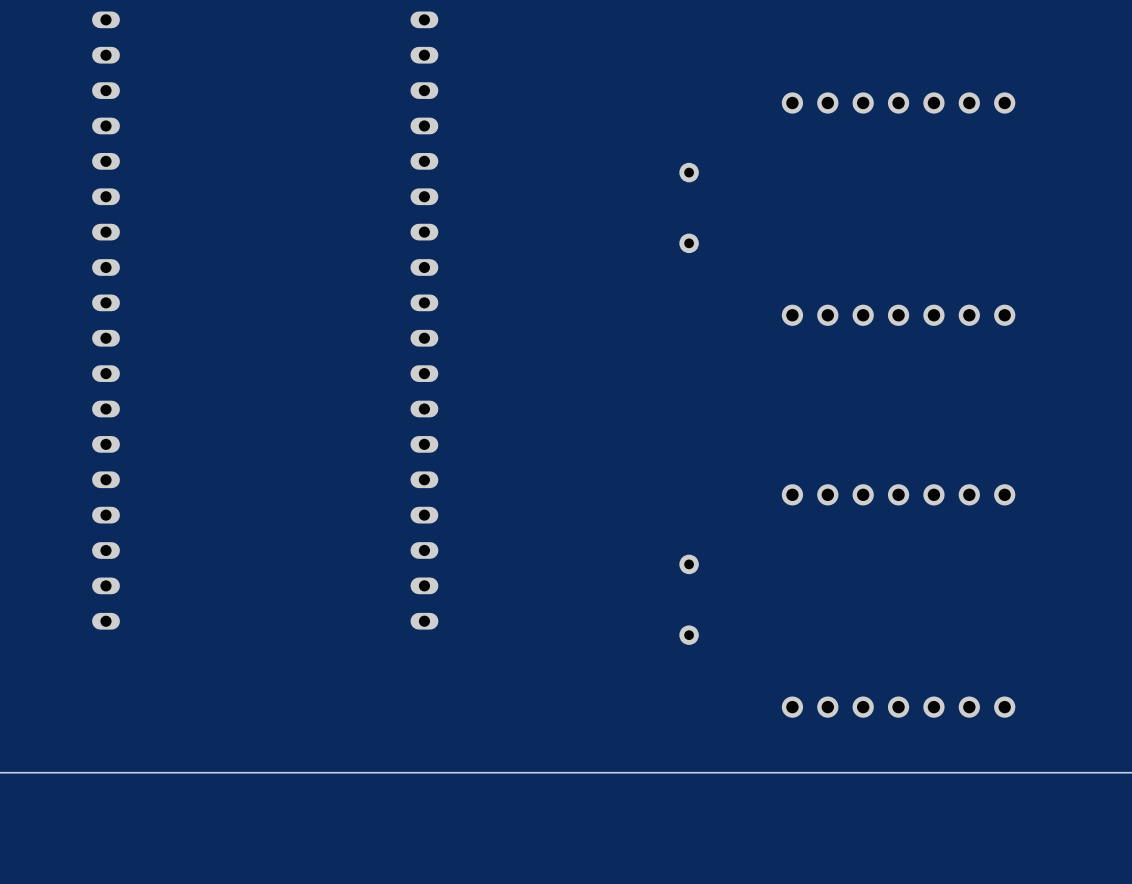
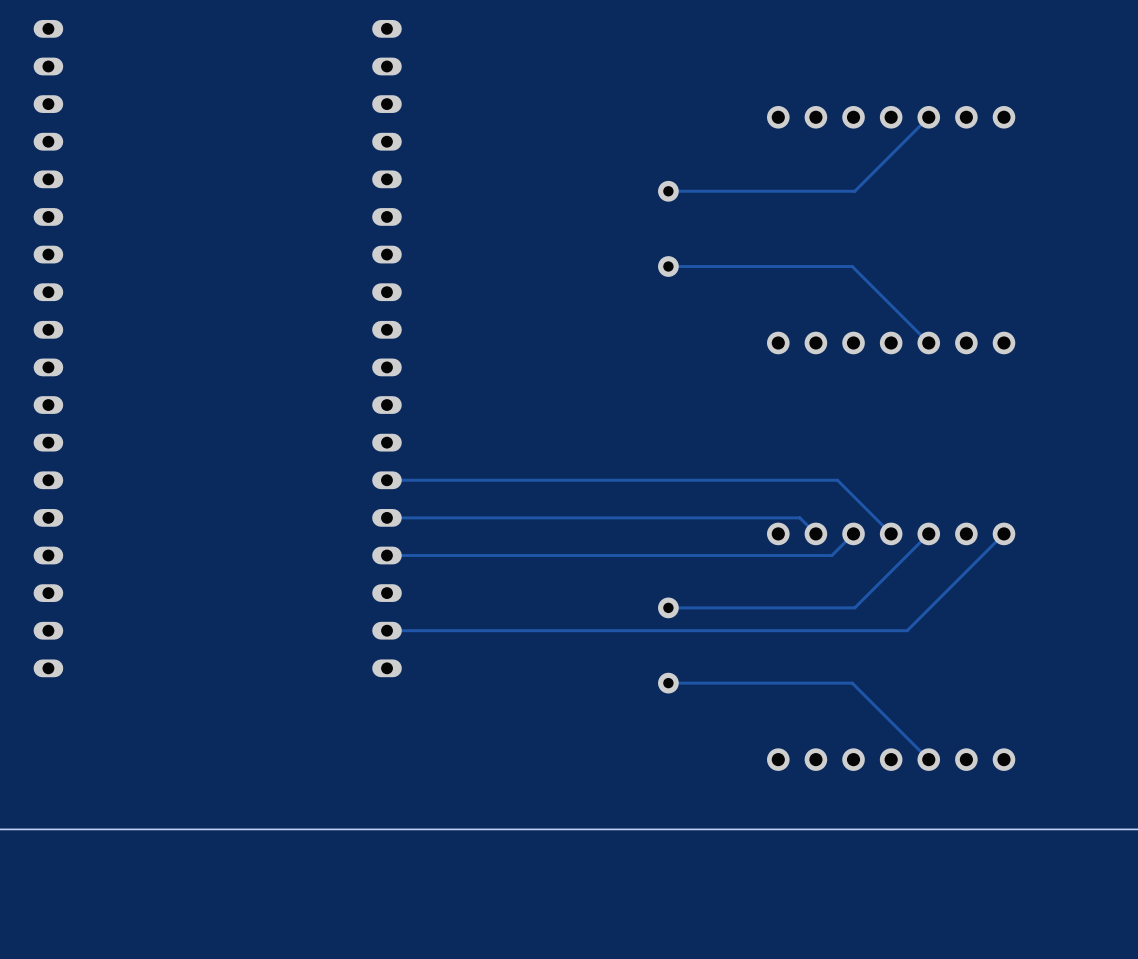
track: none -> (928, 117) (854, 191) (668, 191)
track: none -> (668, 266) (852, 266) (928, 342)
track: none -> (386, 480) (837, 480) (891, 533)
track: none -> (386, 517) (799, 517) (815, 533)
track: none -> (853, 533) (831, 555) (386, 555)
track: none -> (928, 533) (854, 607) (668, 607)
track: none -> (1003, 533) (907, 630) (387, 630)
track: none -> (668, 683) (852, 683) (928, 759)

